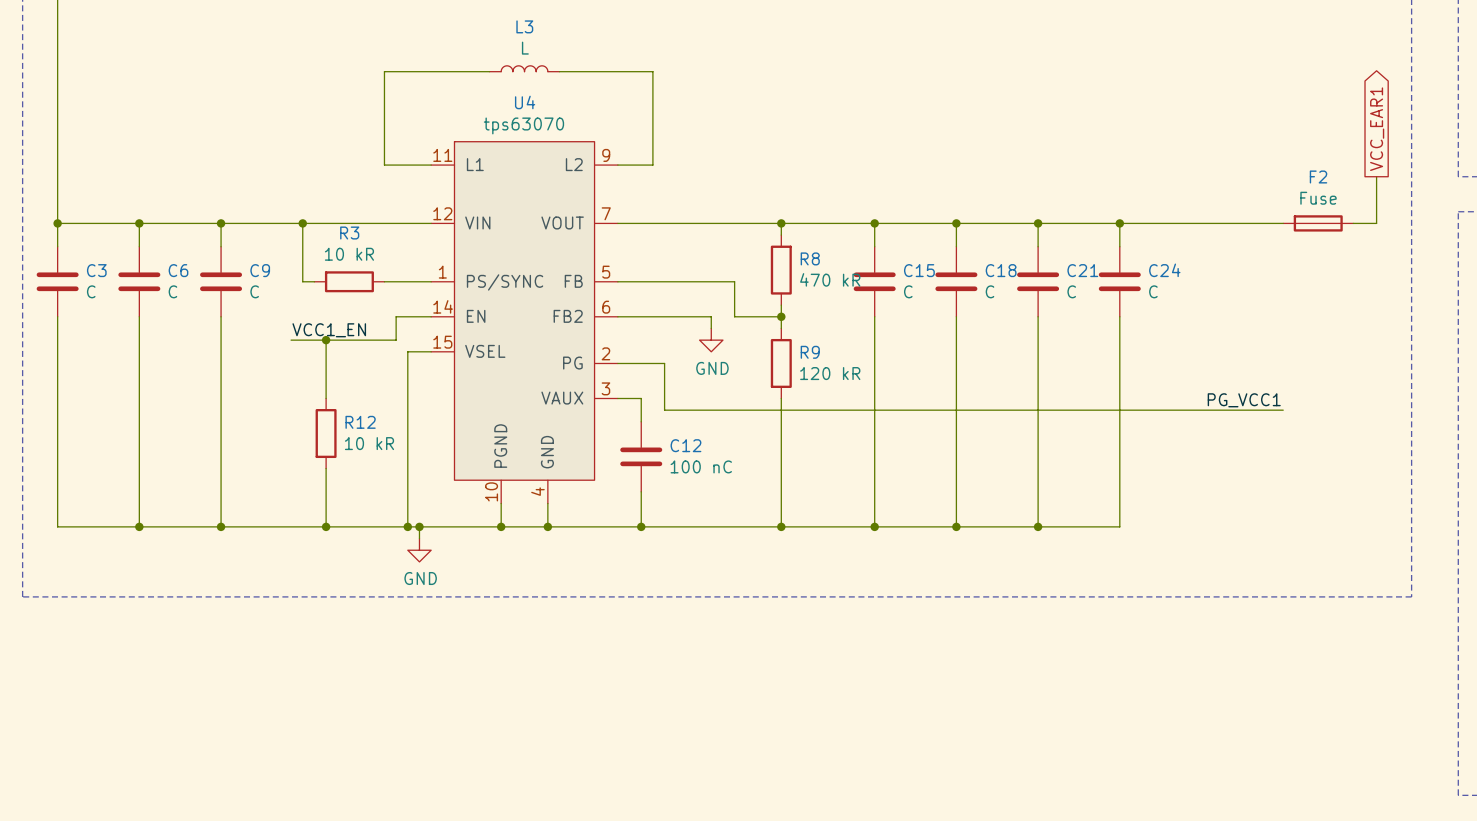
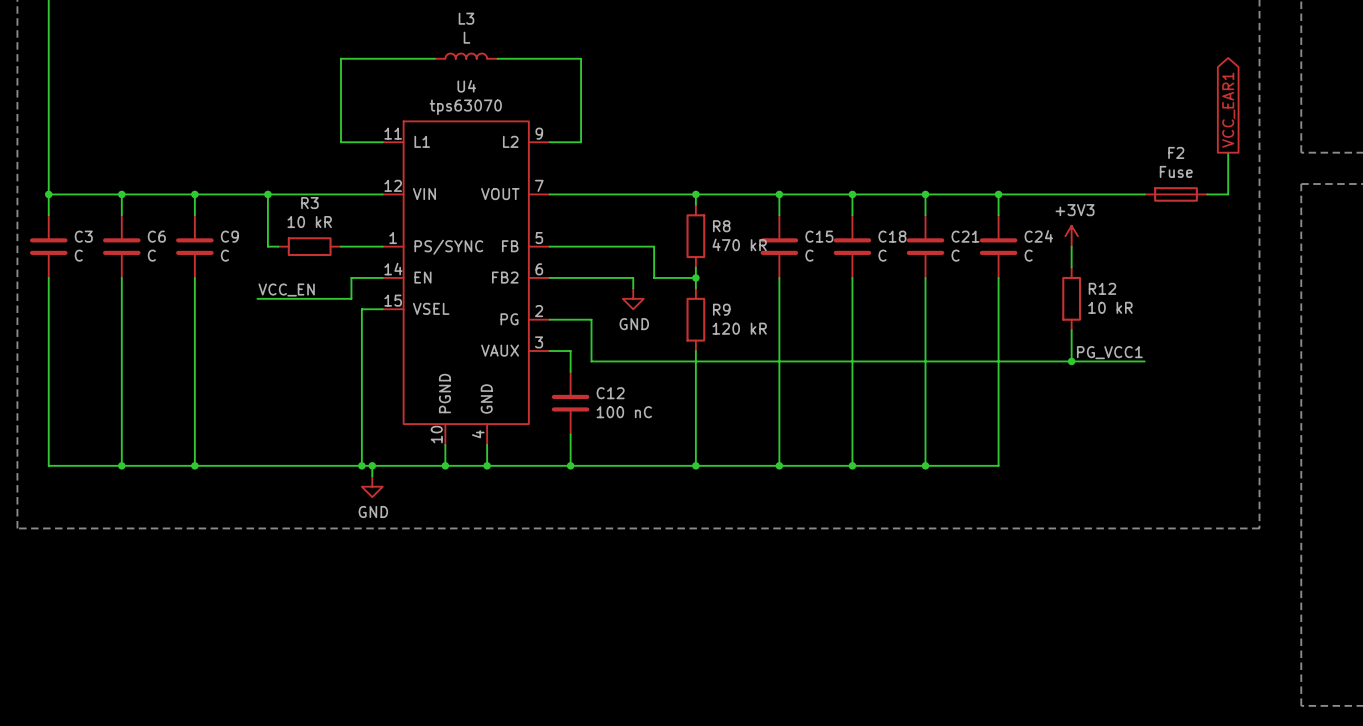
power symbol: none -> +3V3 (1071, 236)
wire: none -> (1071, 246) (1071, 267)
label: VCC1_EN (329, 330) -> VCC_EN (286, 290)
wire: (326, 340) (326, 398) -> none
junction: (326, 340) -> none
wire: none -> (1071, 330) (1071, 361)
junction: none -> (1071, 361)
R12 position: (326, 433) -> (1071, 298)
wire: (326, 468) (326, 526) -> none
junction: (326, 526) -> none

